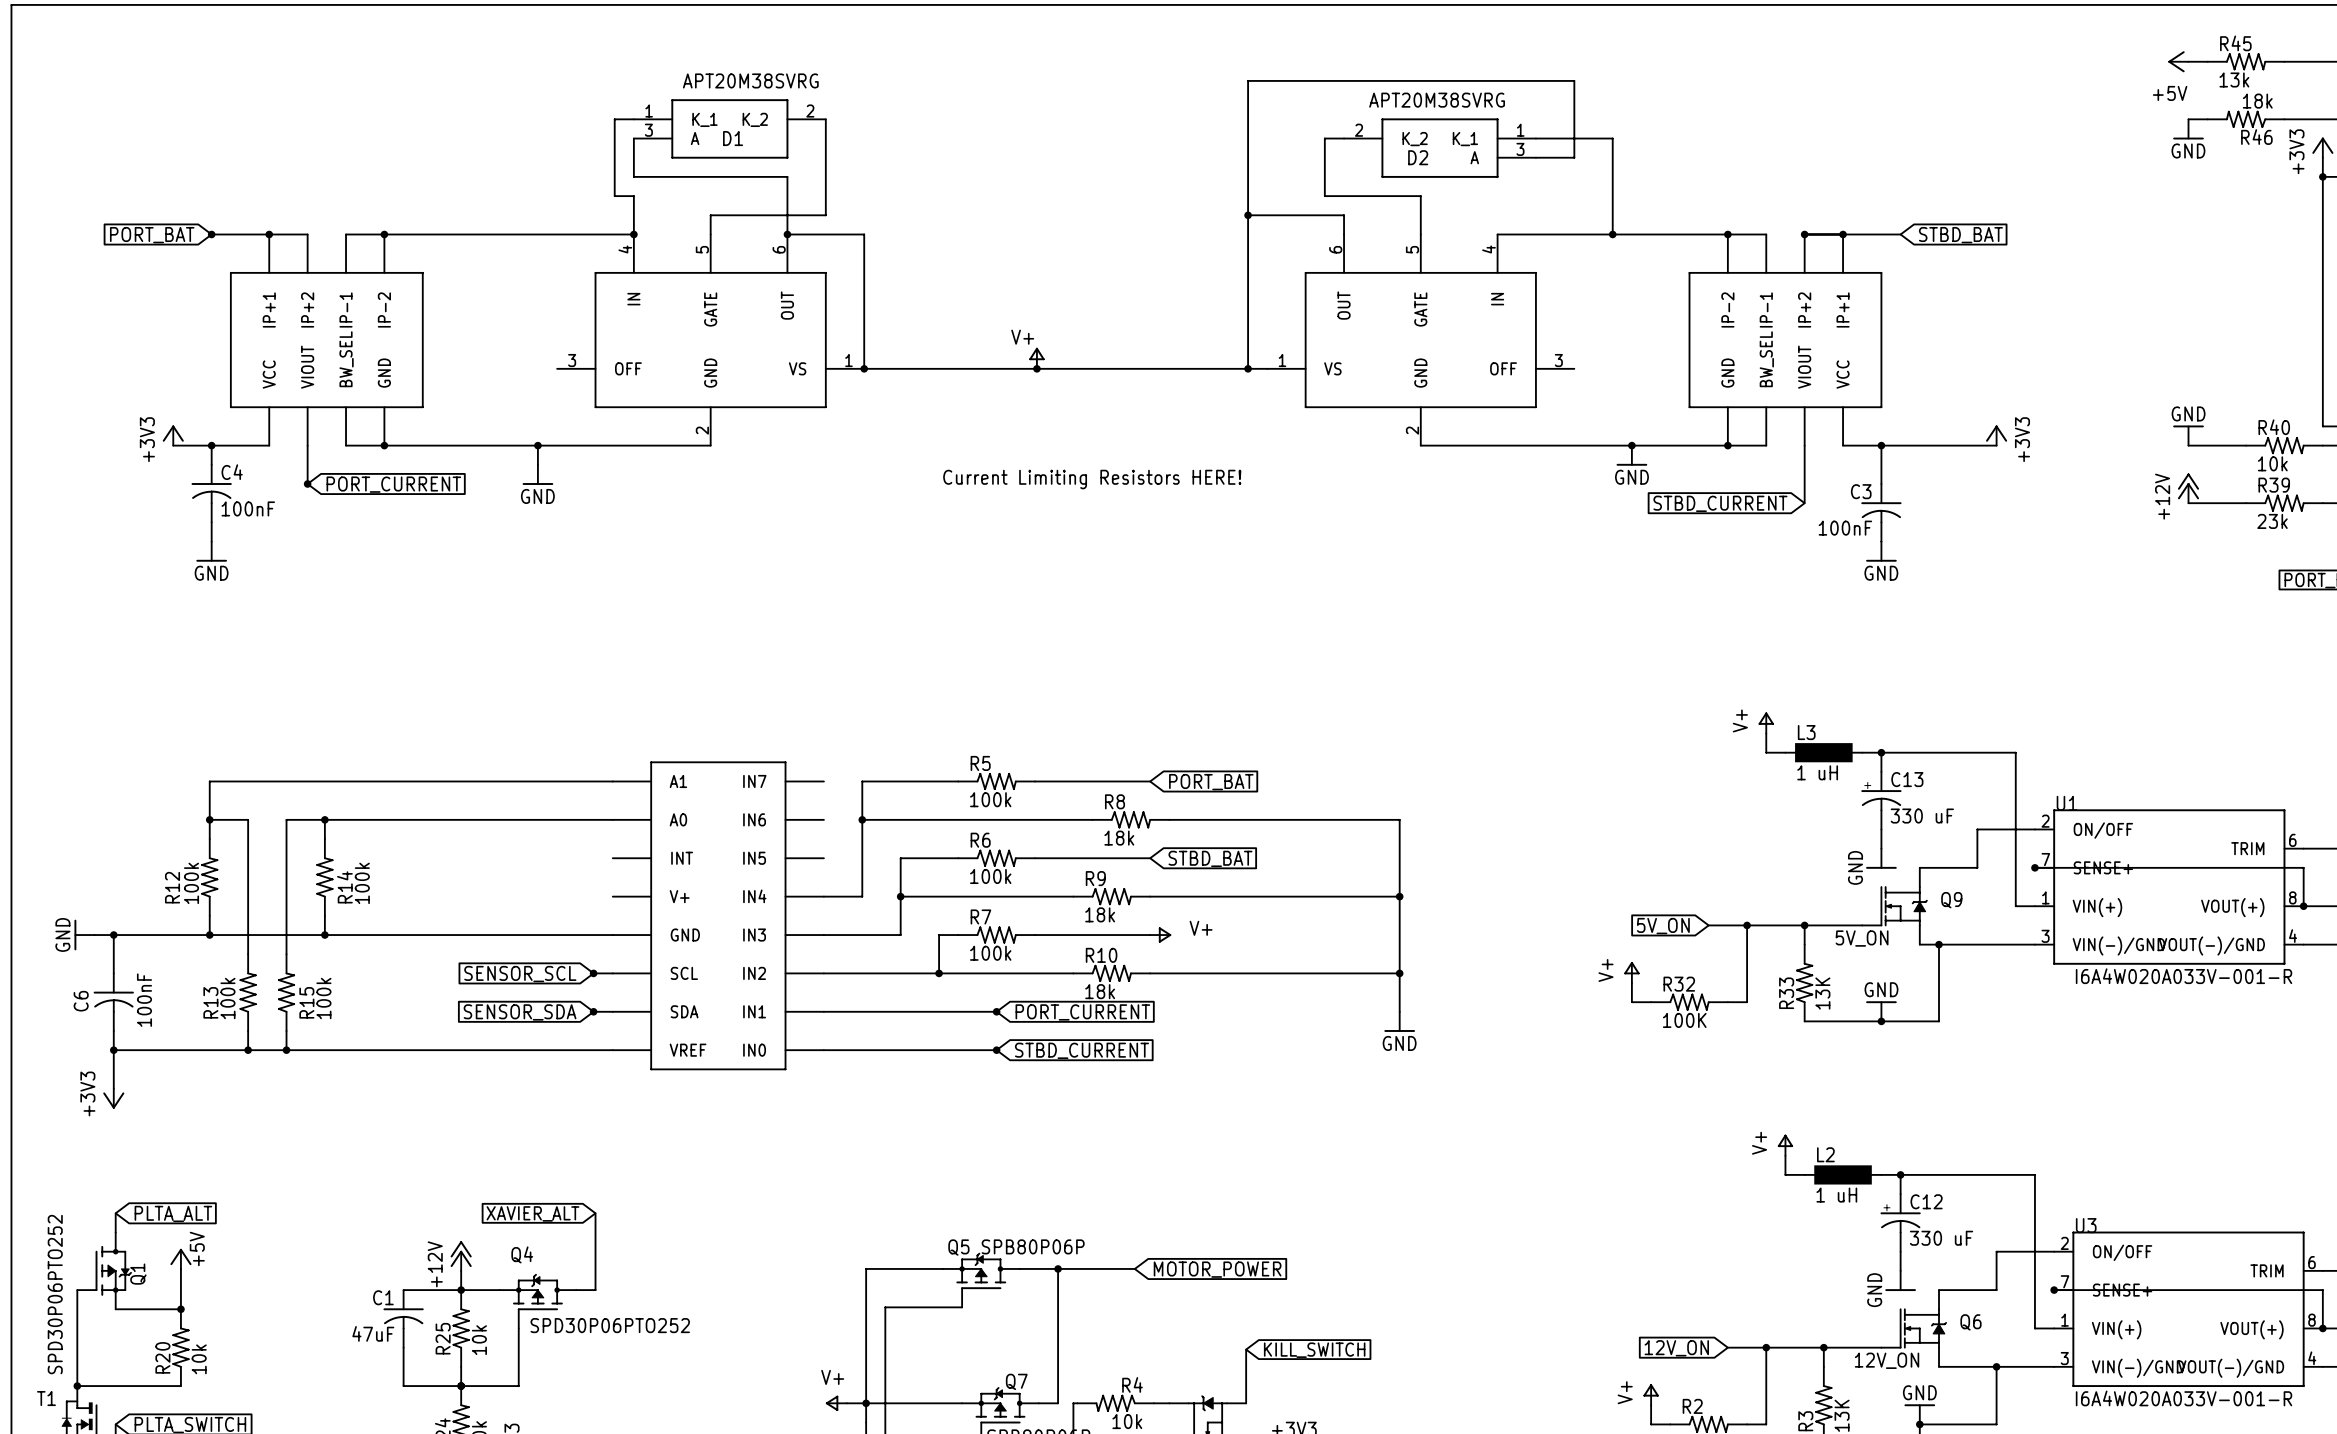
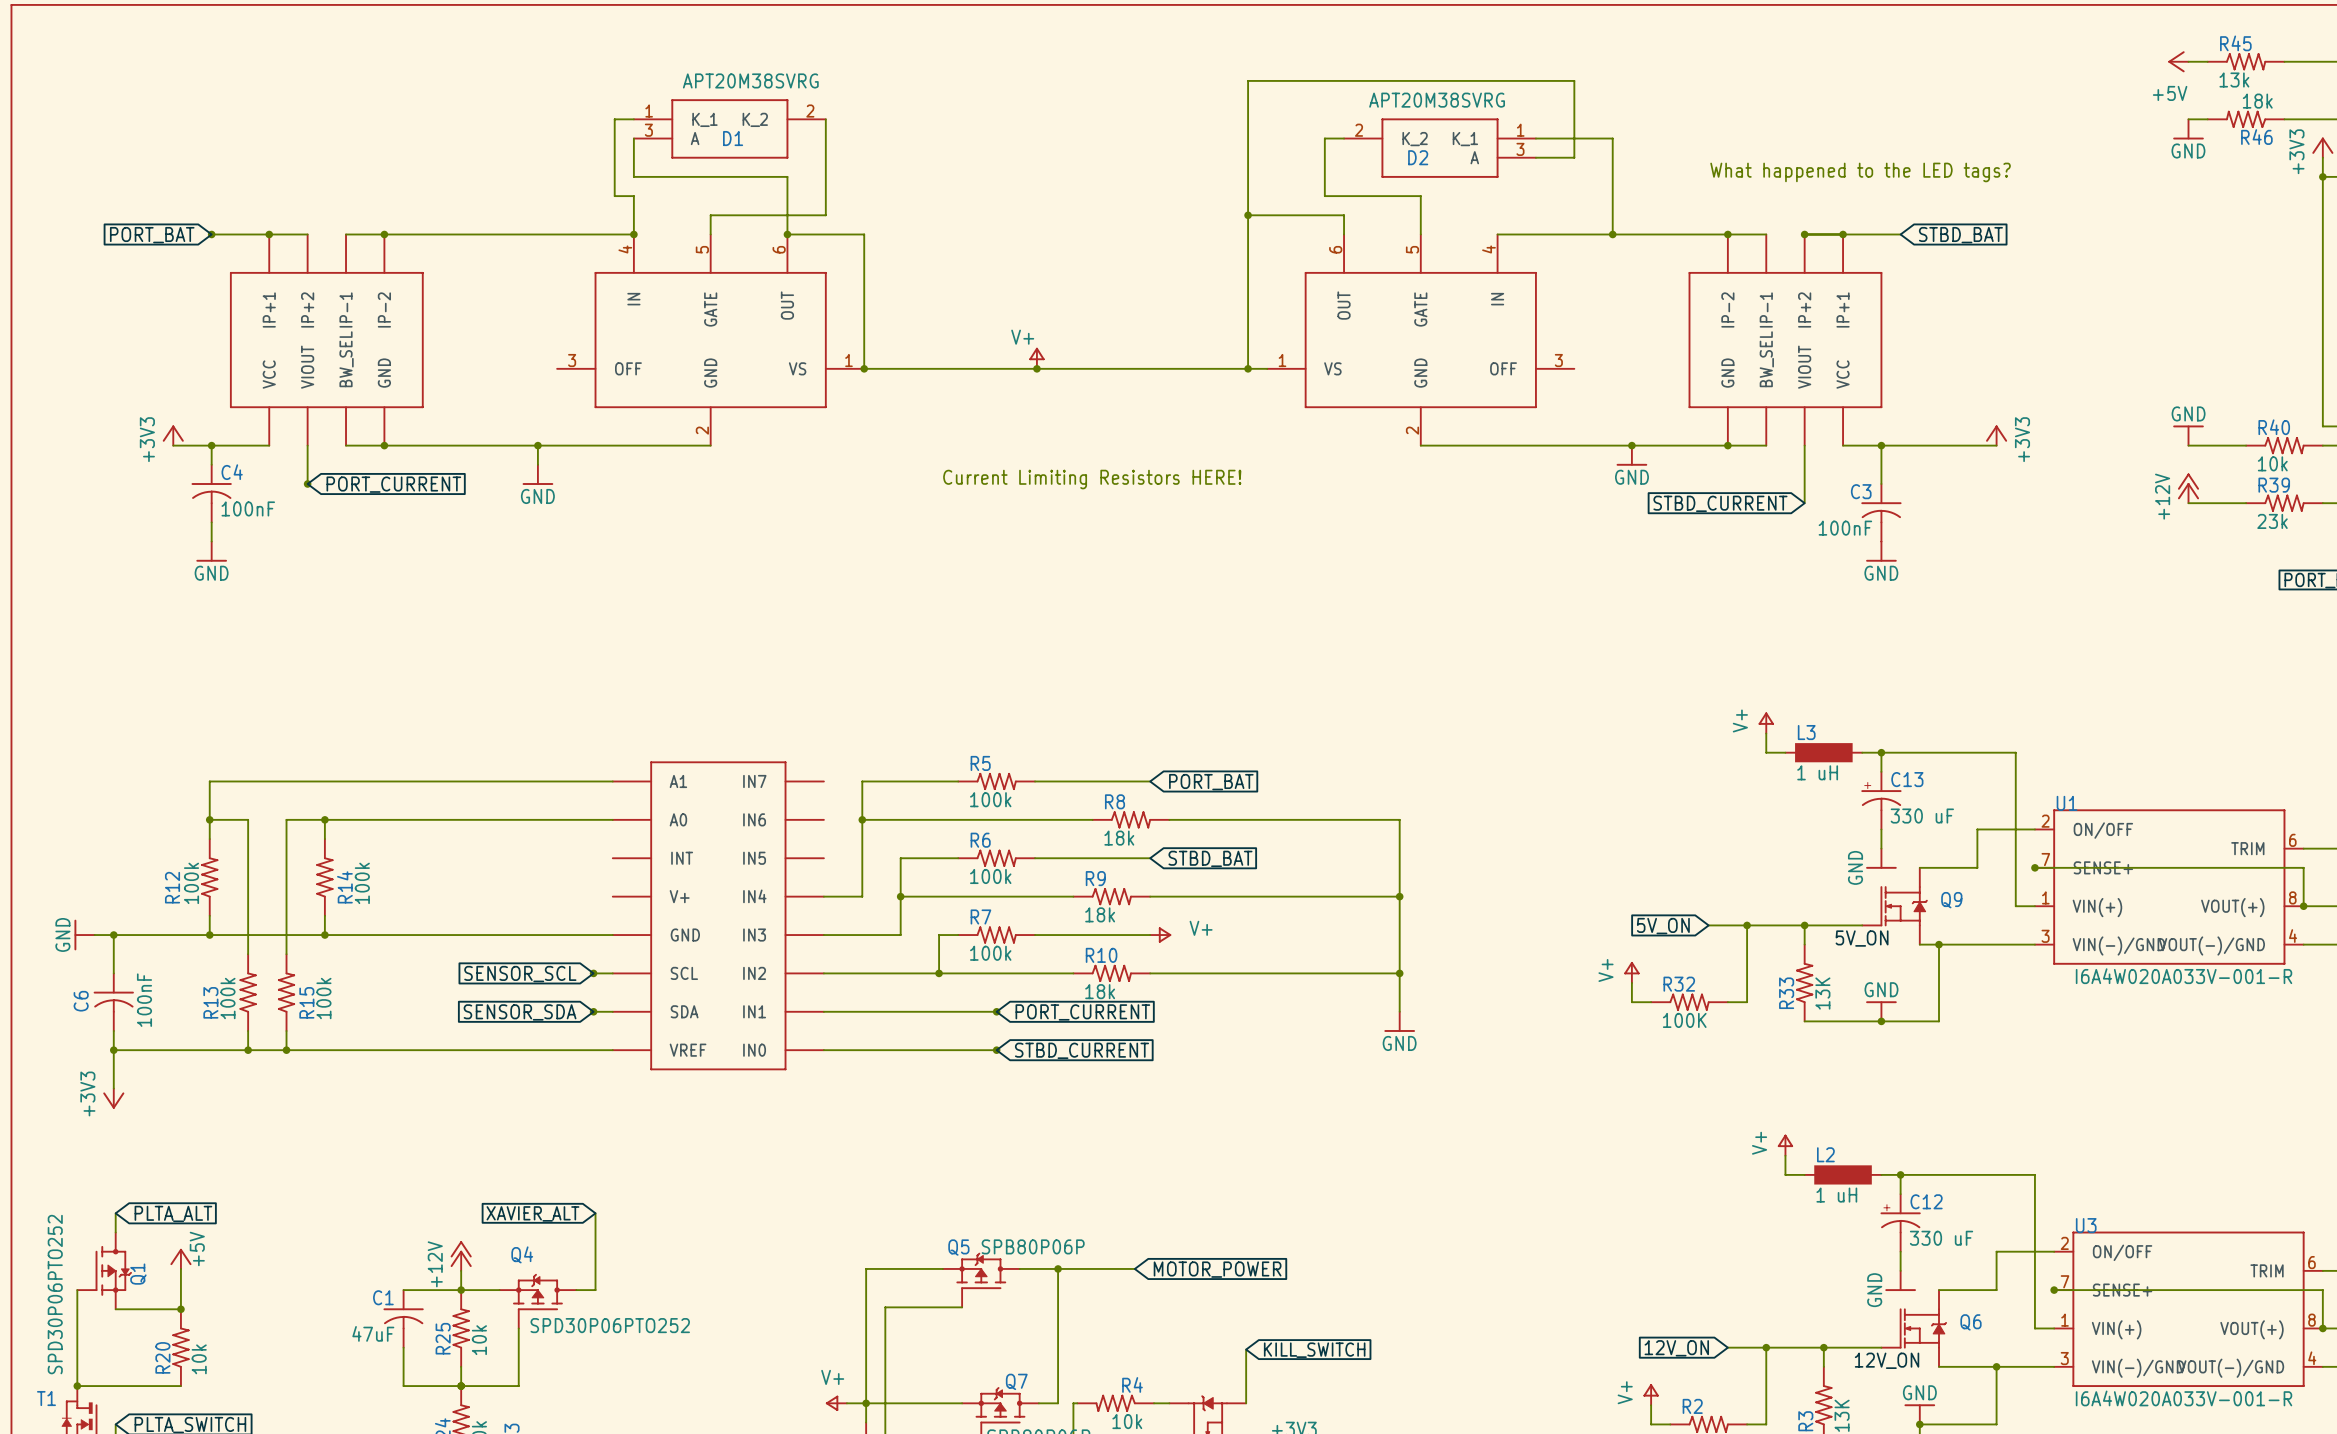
text: none -> What happened to the LED tags? (1860, 172)

